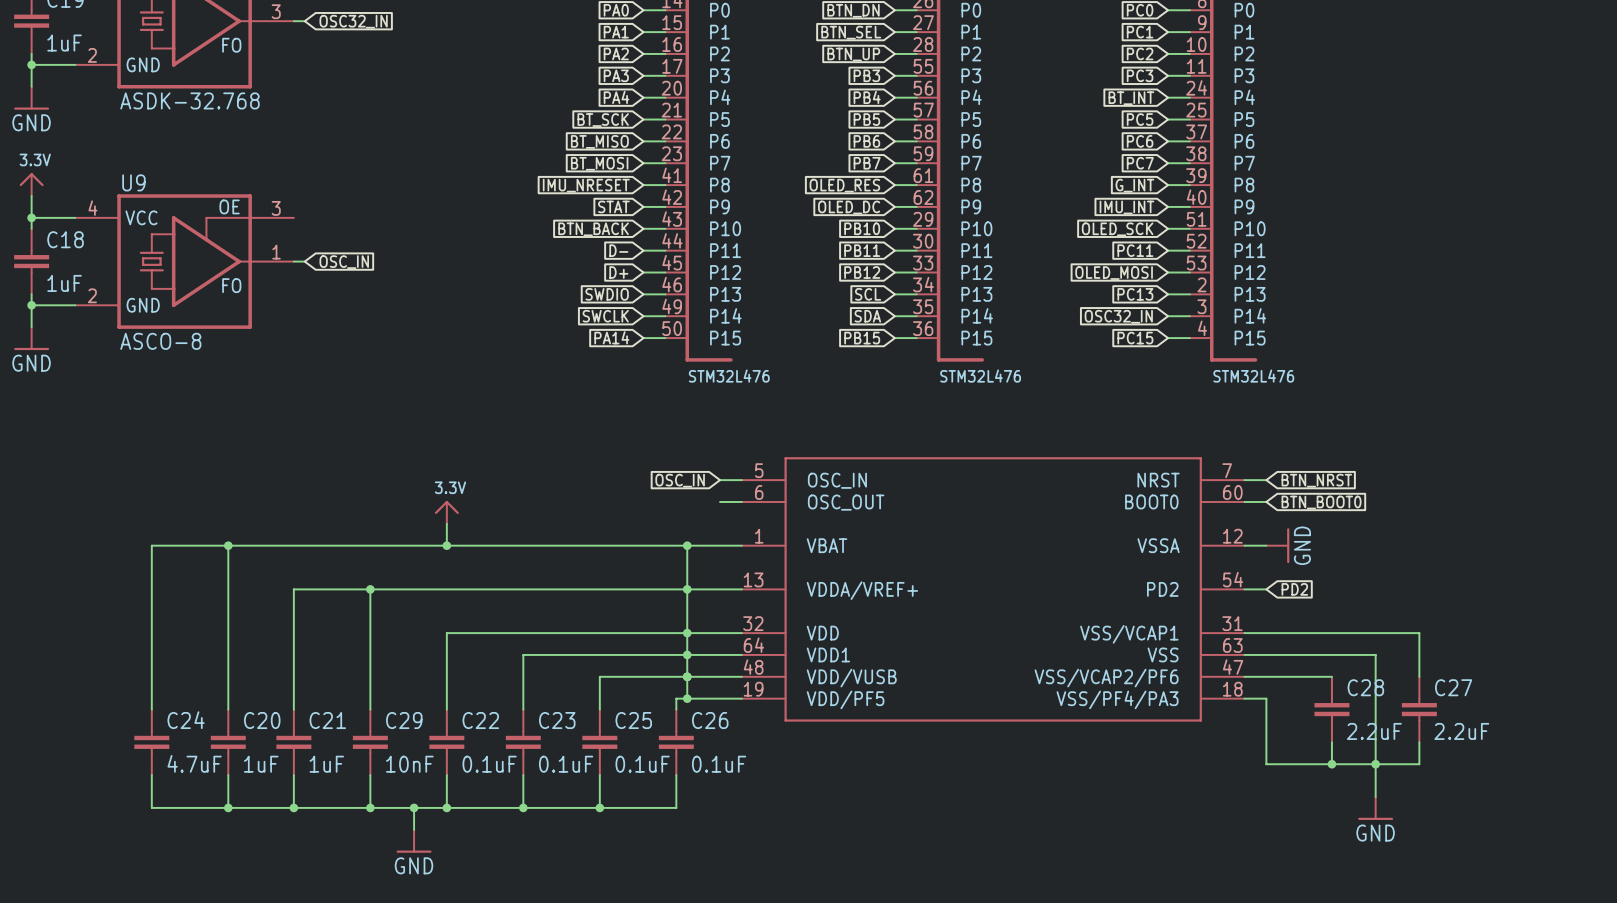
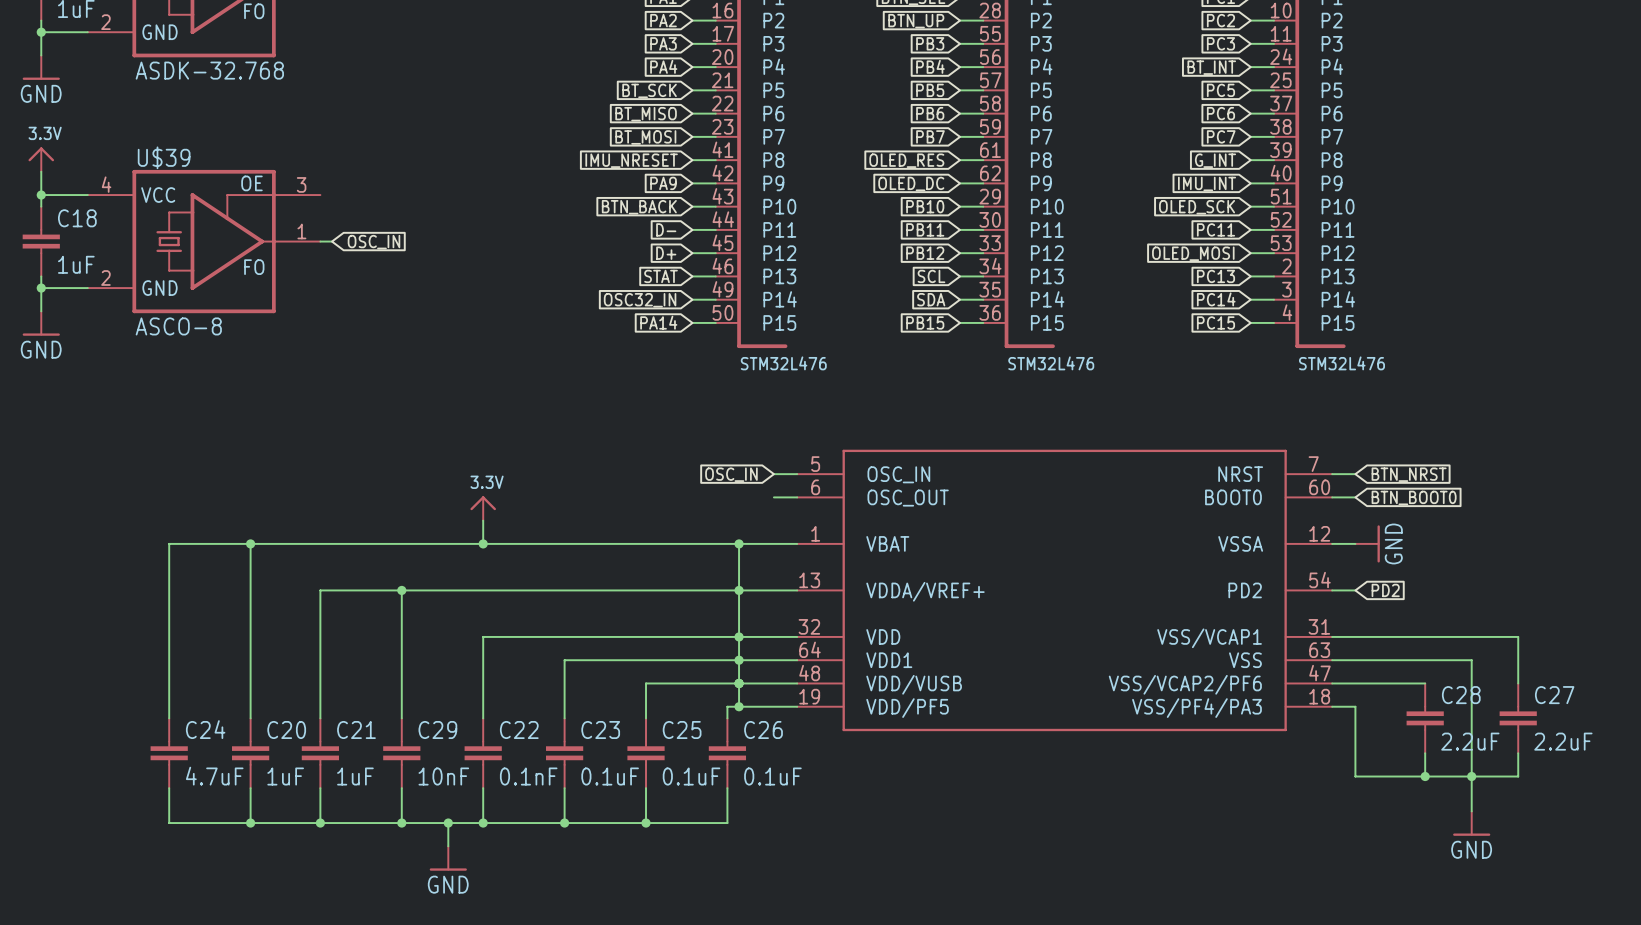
U9 name: U9 (133, 182) -> U$39 (164, 157)
global label: STAT (613, 206) -> PA9 (663, 183)
global label: SWDIO (607, 294) -> STAT (661, 276)
global label: SWCLK (605, 316) -> OSC32_IN (640, 300)
global label: OSC32_IN (1118, 316) -> PC14 (1216, 299)
C22 value: 0.1uF (489, 764) -> 0.1nF (528, 776)

